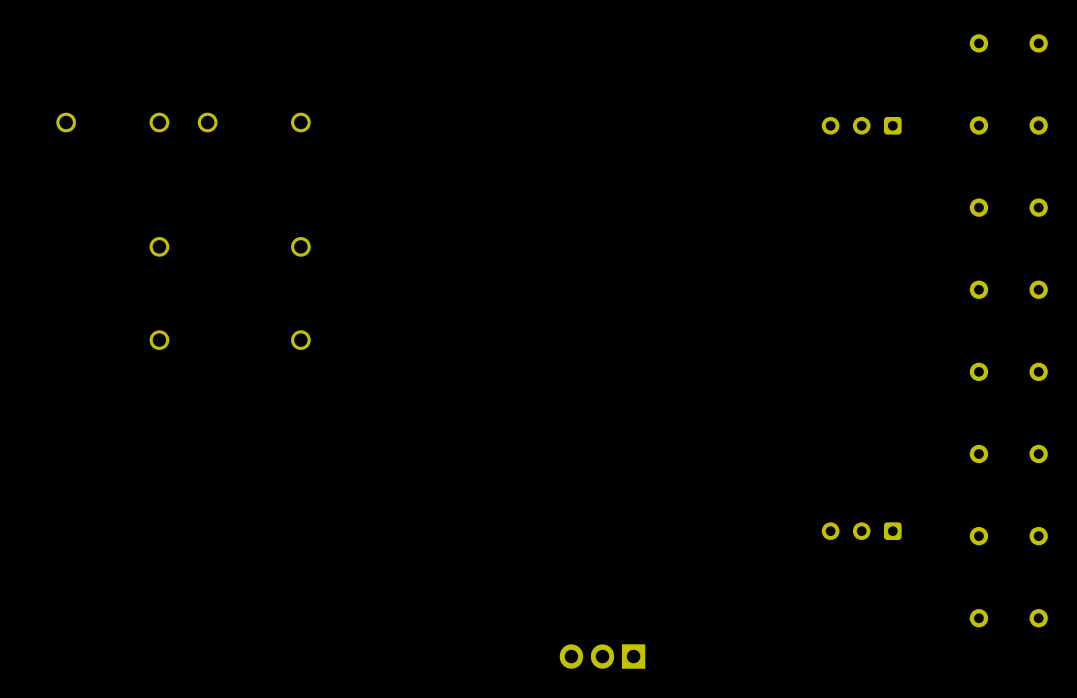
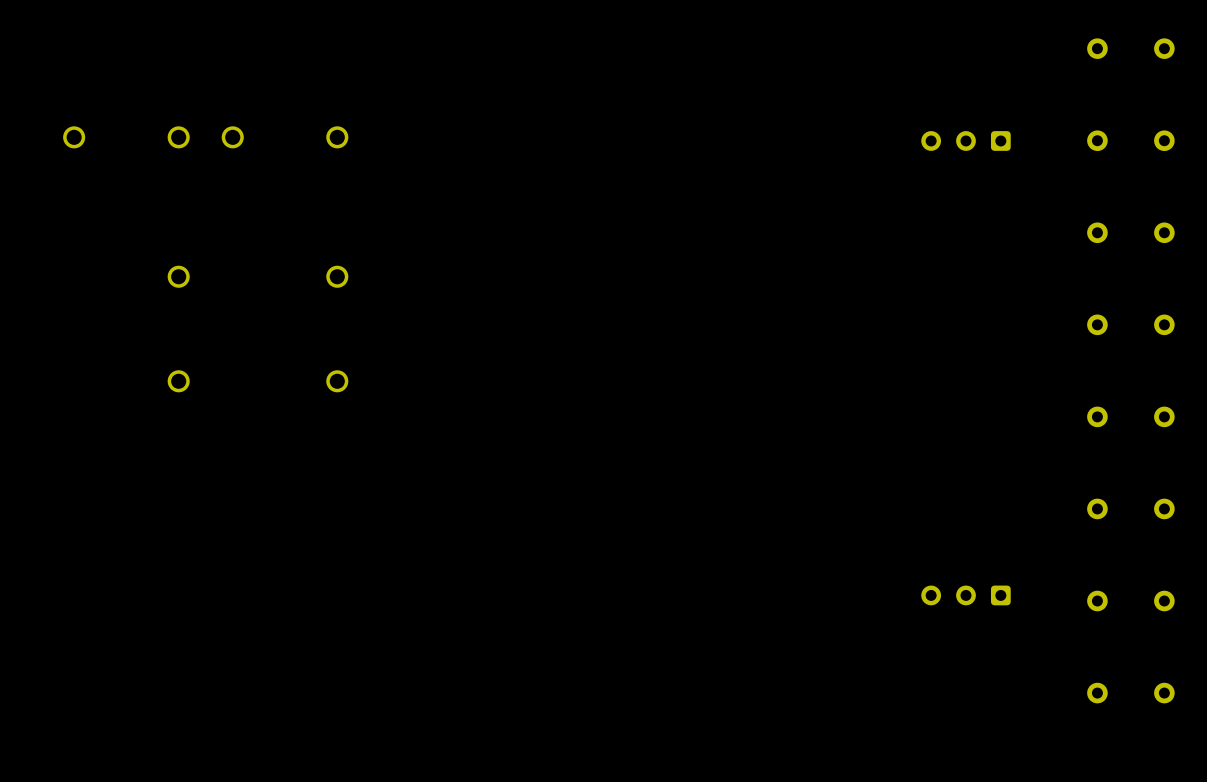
part: (602, 656) -> none

